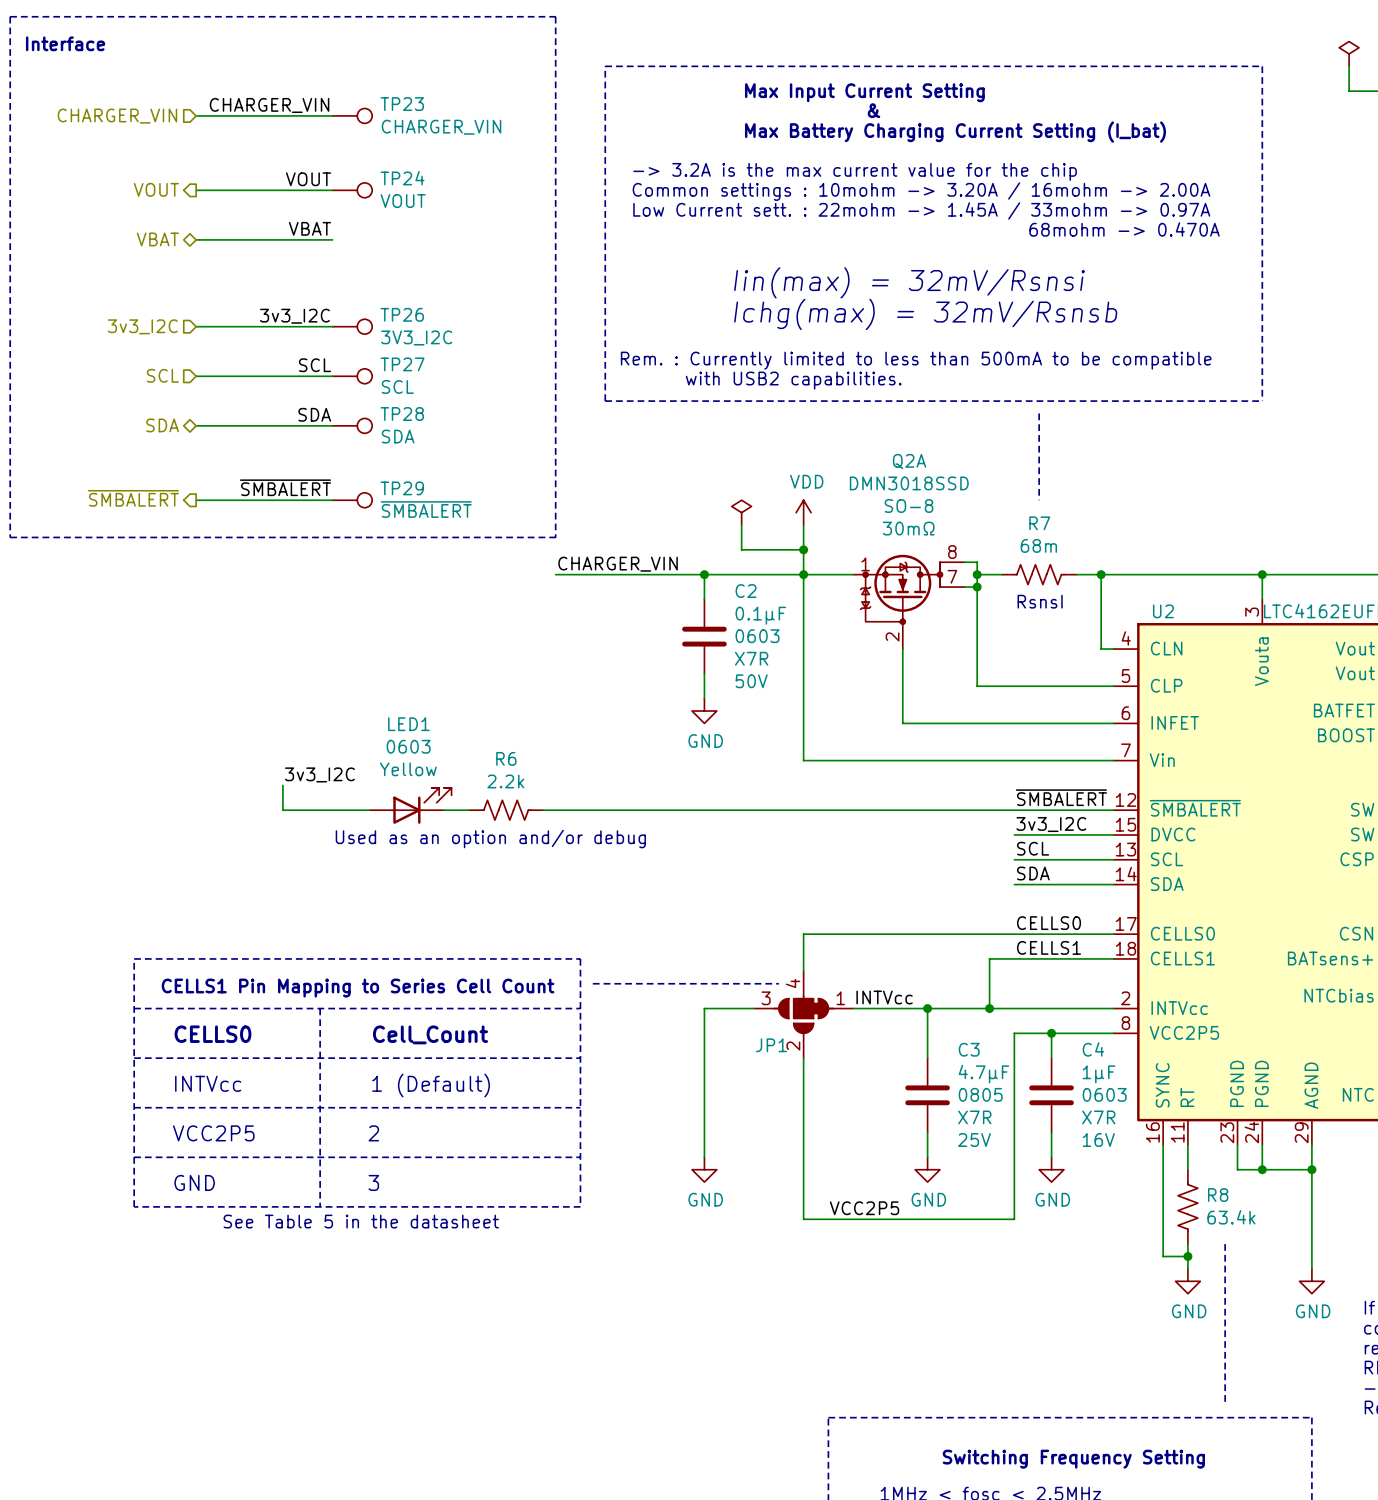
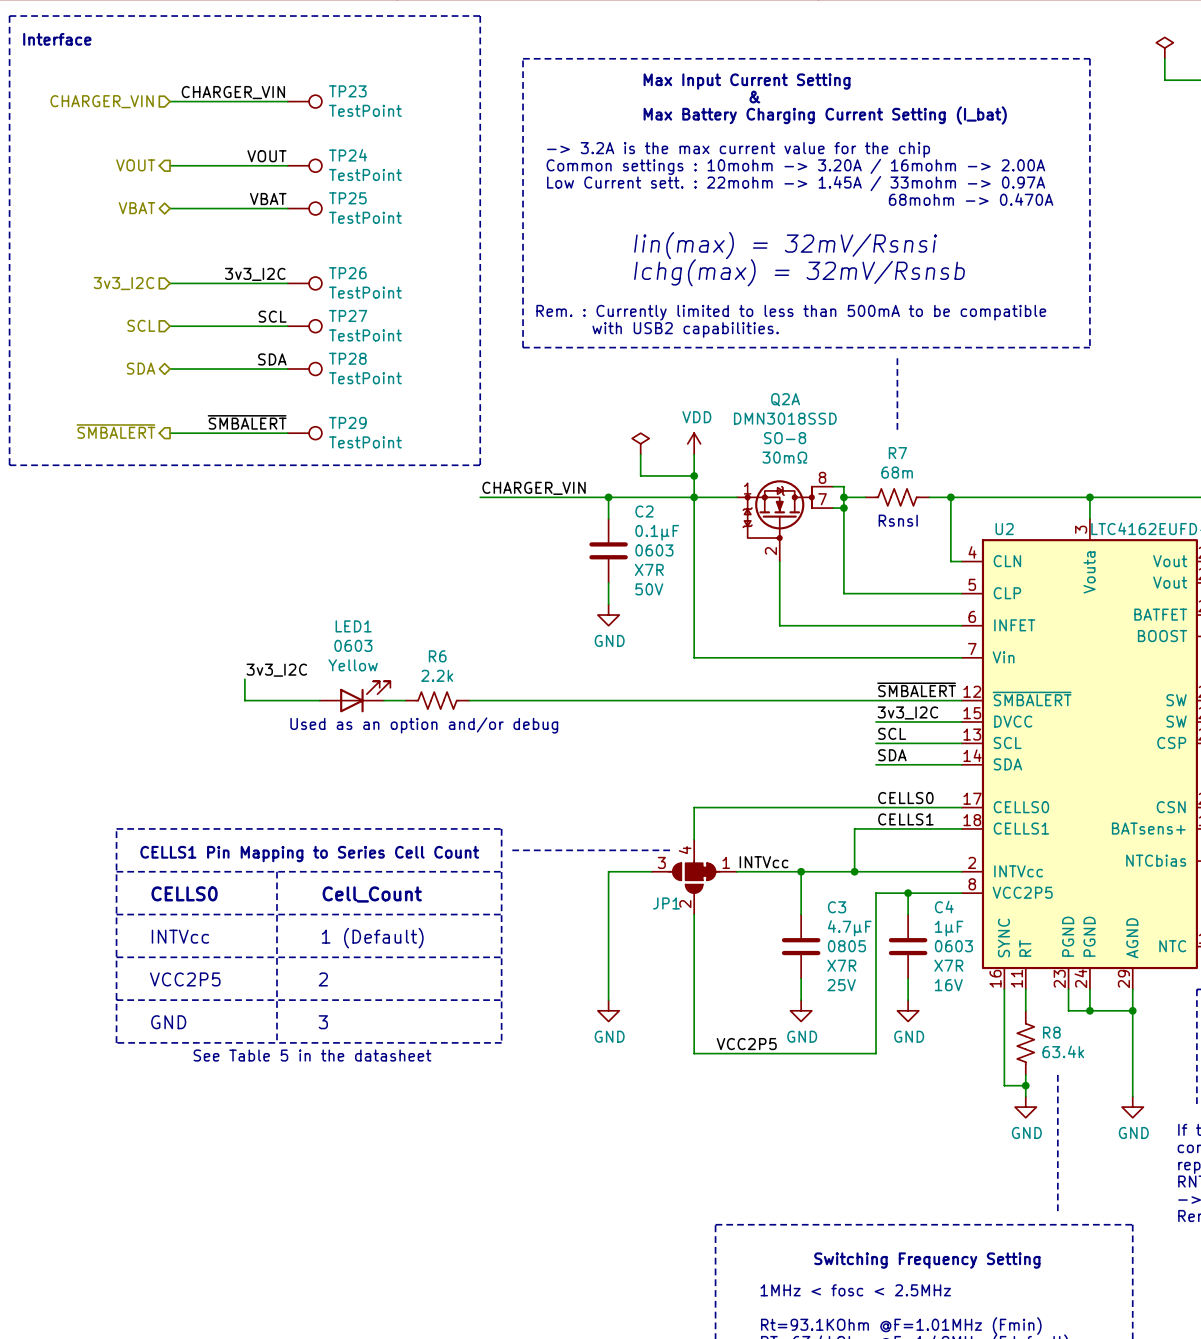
TP23 value: CHARGER_VIN (441, 127) -> TestPoint (365, 110)
TP24 value: VOUT (403, 201) -> TestPoint (365, 174)
TP25: none -> TestPoint (304, 208)
TP26 value: 3V3_I2C (416, 337) -> TestPoint (365, 292)
TP27 value: SCL (397, 386) -> TestPoint (365, 335)
TP28 value: SDA (398, 436) -> TestPoint (365, 378)
TP29 value: ~{SMBALERT} (426, 509) -> TestPoint (365, 442)

